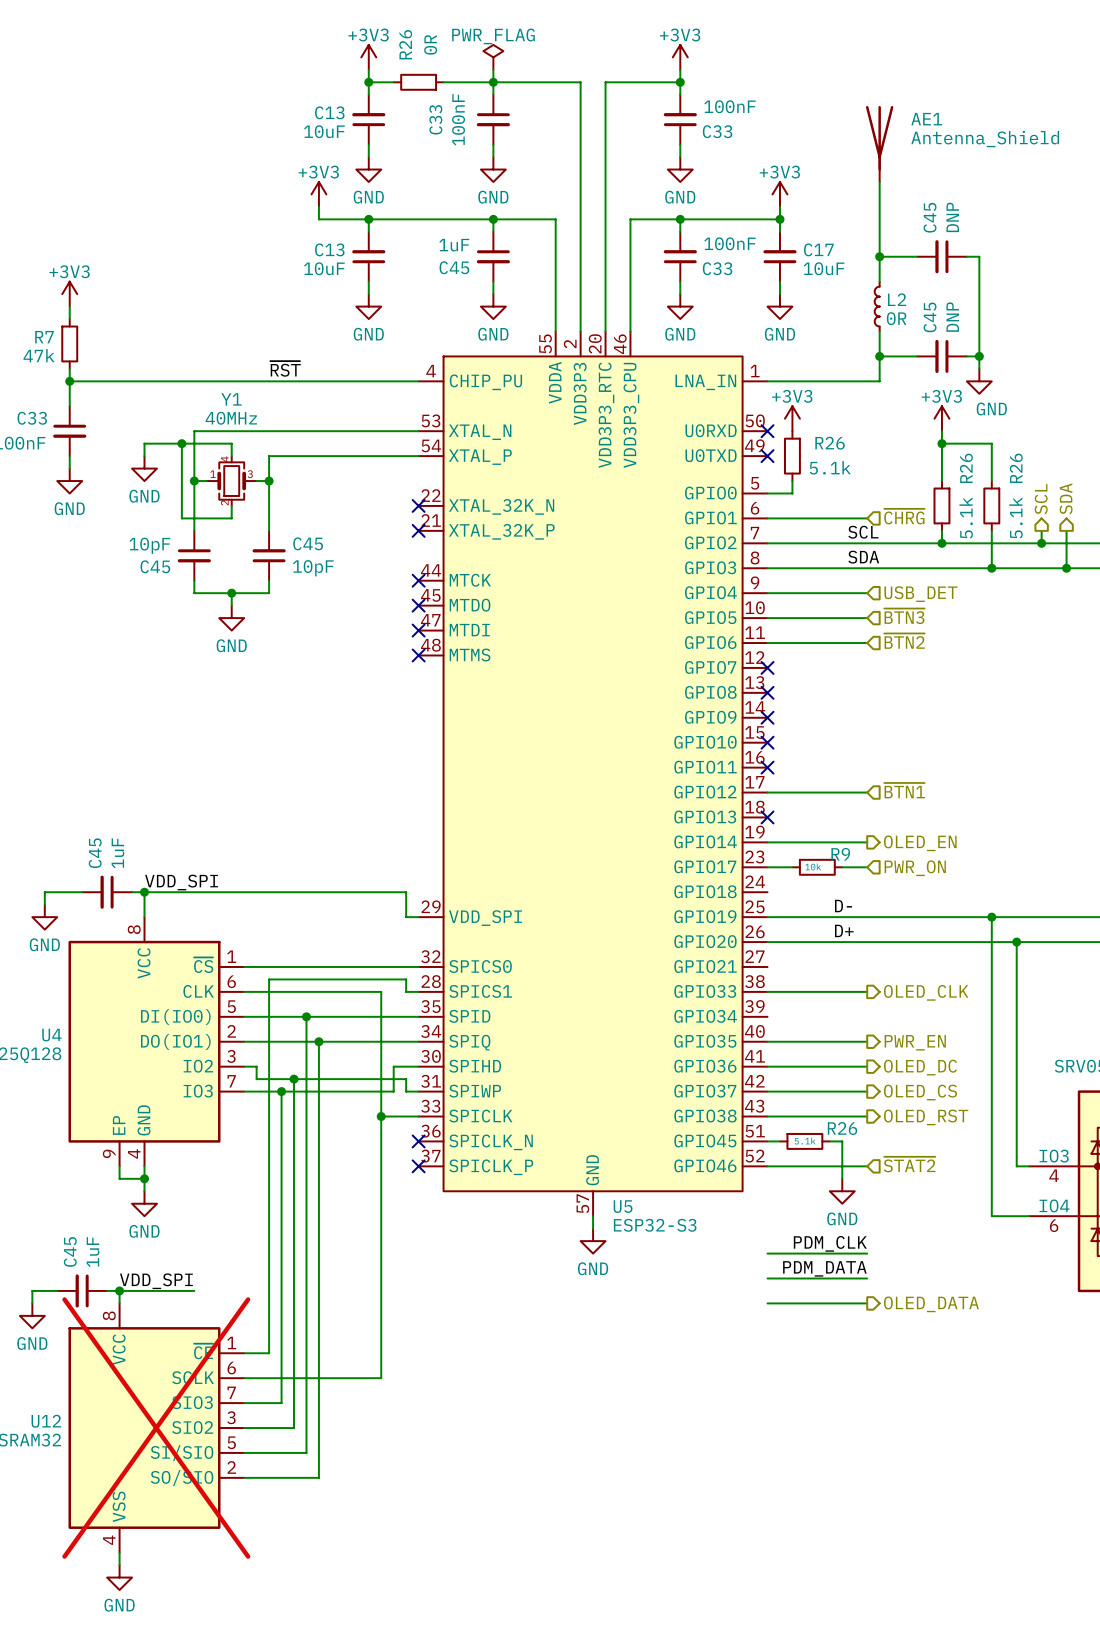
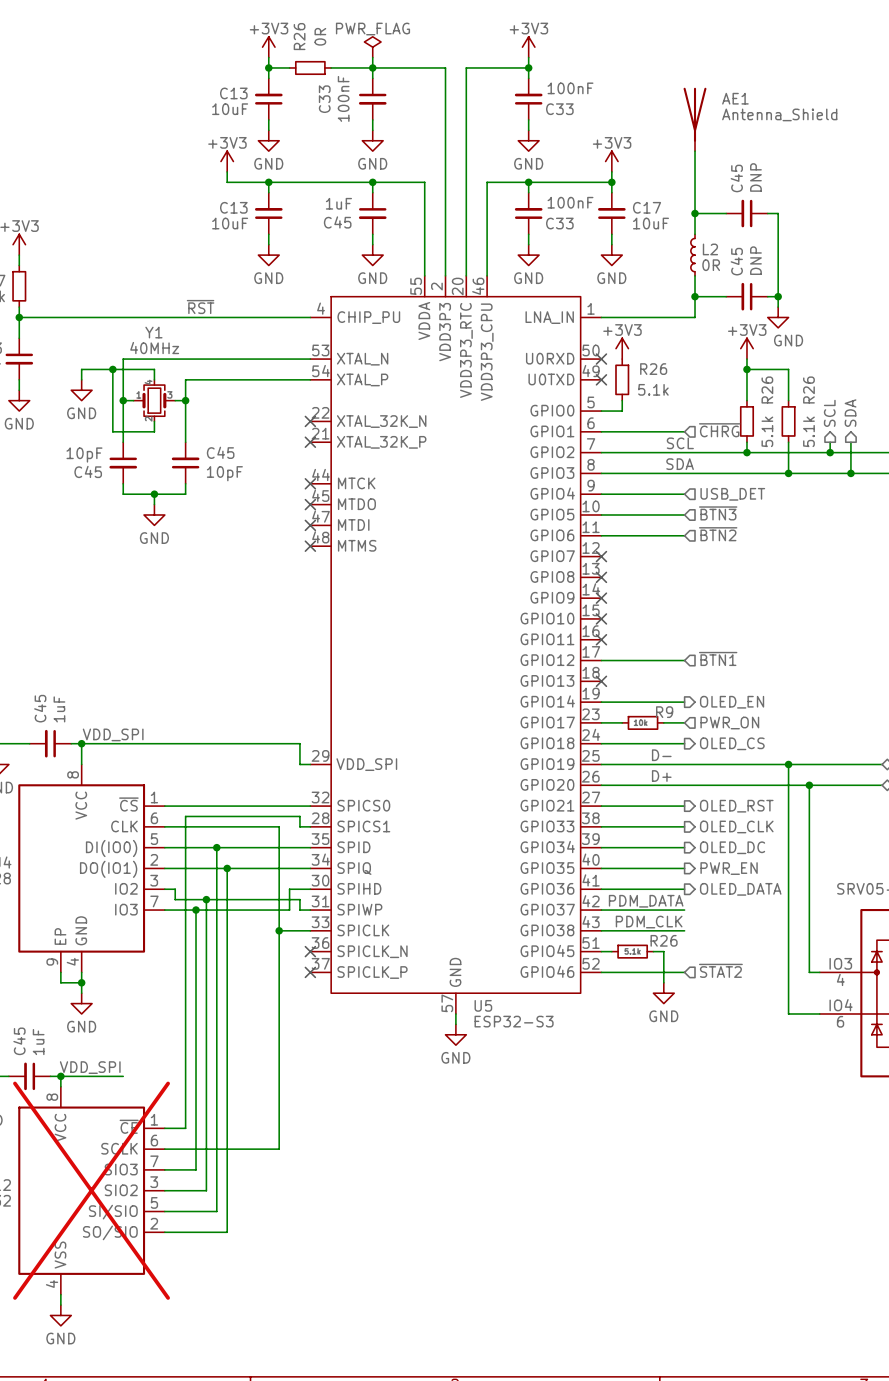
wire: none -> (601, 743) (684, 743)
wire: none -> (601, 806) (684, 806)
hierarchical label: none -> OLED_DC (732, 847)
hierarchical label: OLED_DC (920, 1067) -> OLED_DATA (740, 889)
hierarchical label position: OLED_CS (920, 1092) -> OLED_CS (732, 743)
hierarchical label position: OLED_RST (926, 1117) -> OLED_RST (736, 806)
label position: PDM_CLK (830, 1243) -> PDM_CLK (649, 922)
wire: (767, 1253) (867, 1253) -> (601, 847) (684, 847)
label position: PDM_DATA (824, 1268) -> PDM_DATA (646, 901)
wire: (767, 1278) (867, 1278) -> none
wire: (767, 1303) (867, 1303) -> none
hierarchical label: OLED_DATA (931, 1304) -> none

